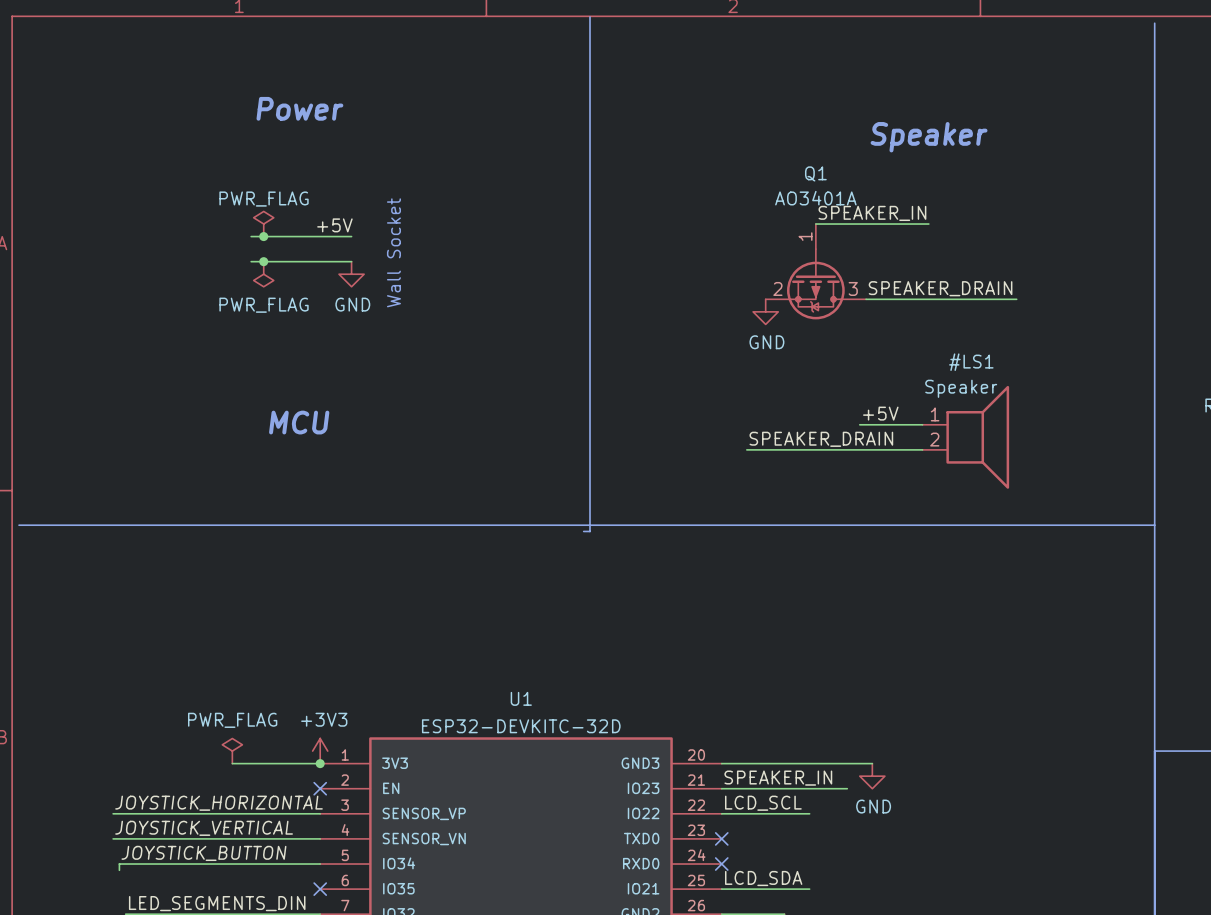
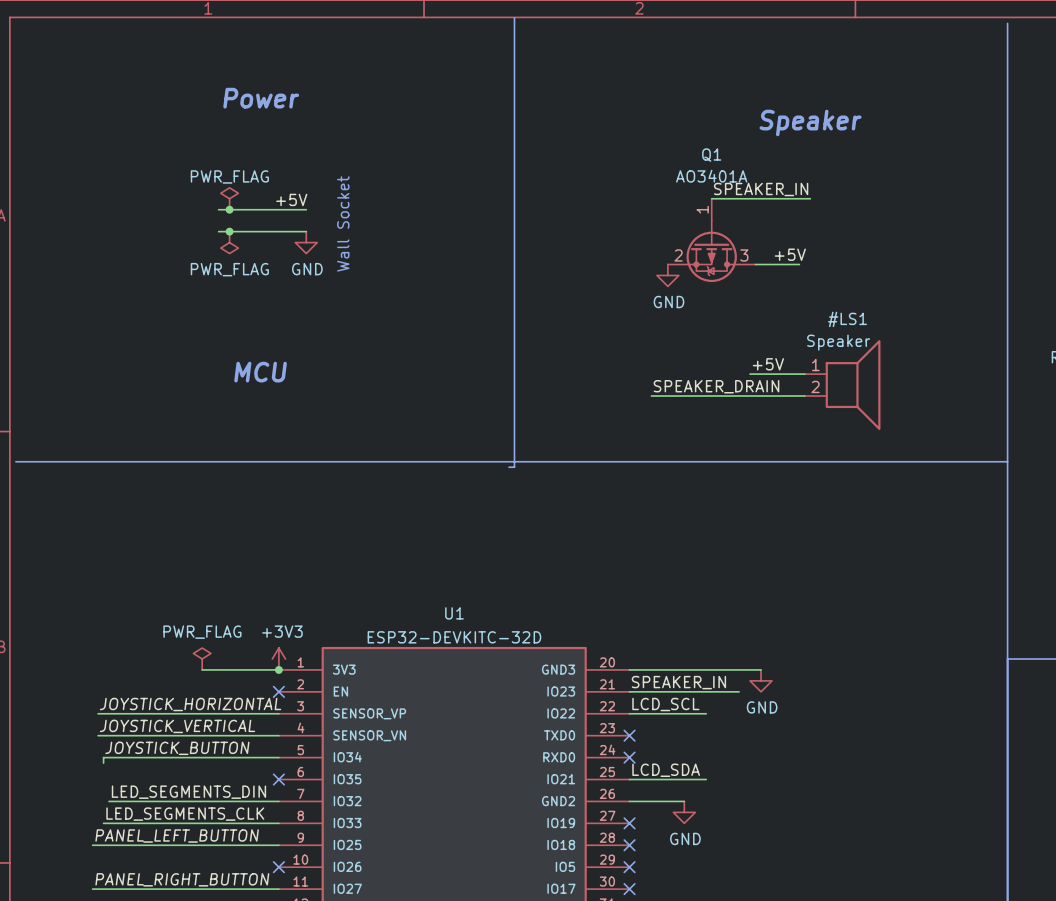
label: none -> +5V (790, 254)
label: SPEAKER_DRAIN (940, 288) -> none
wire: (916, 299) (1016, 299) -> none

